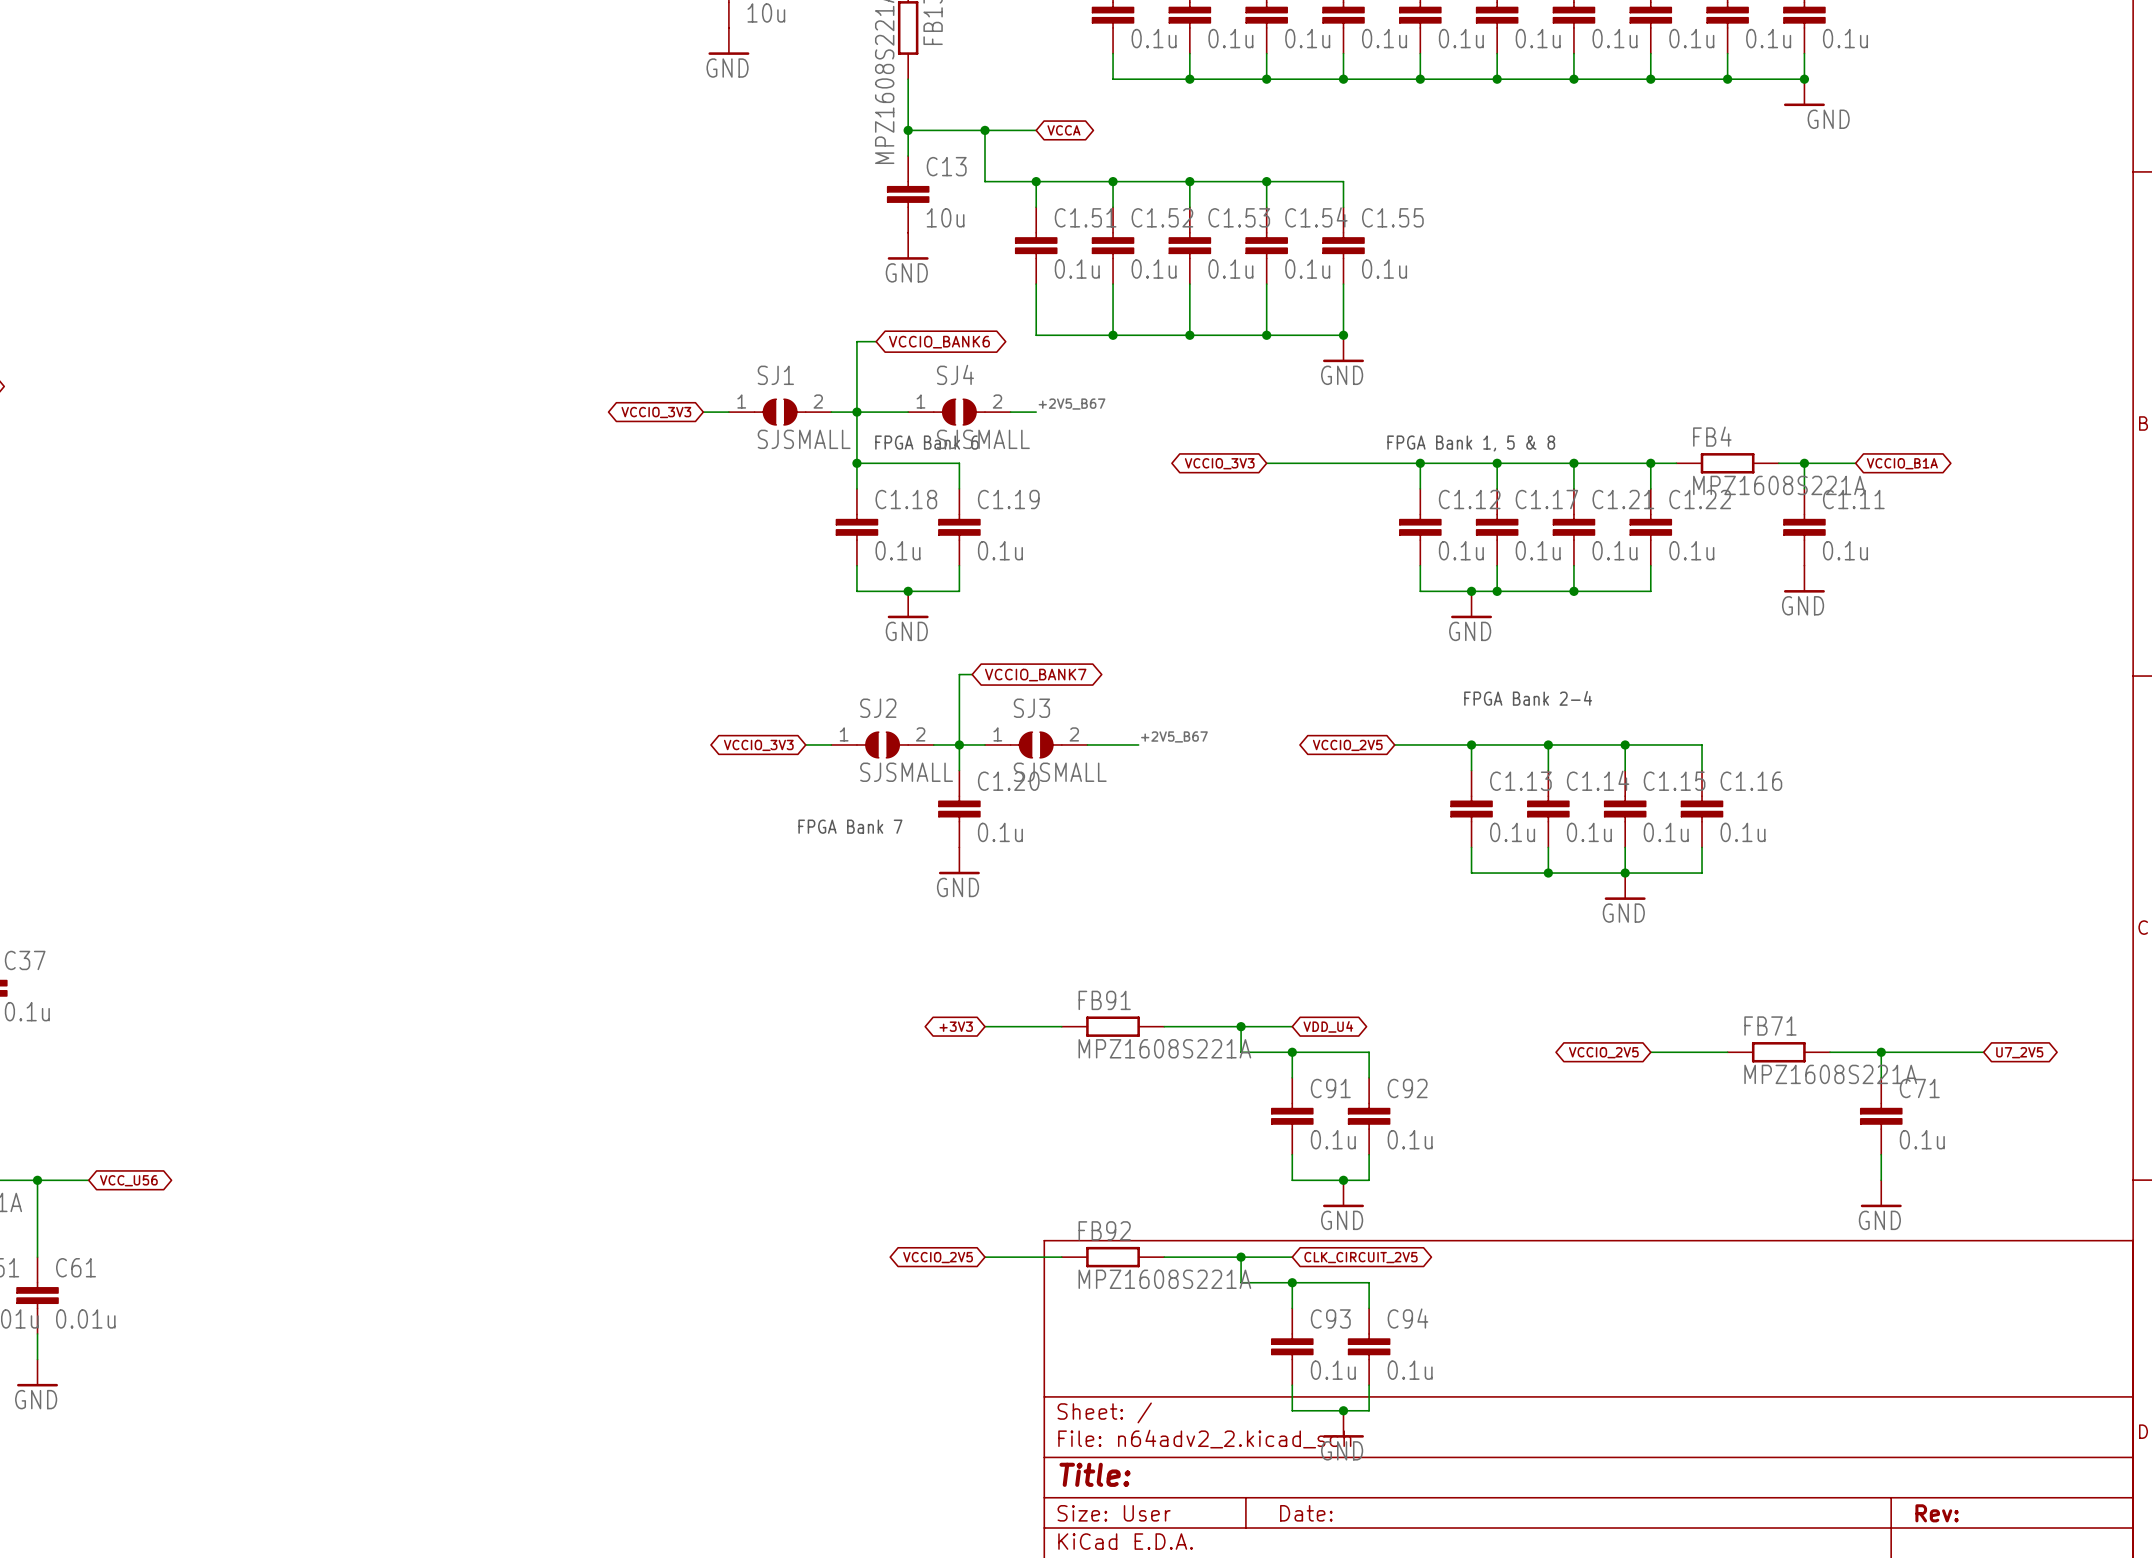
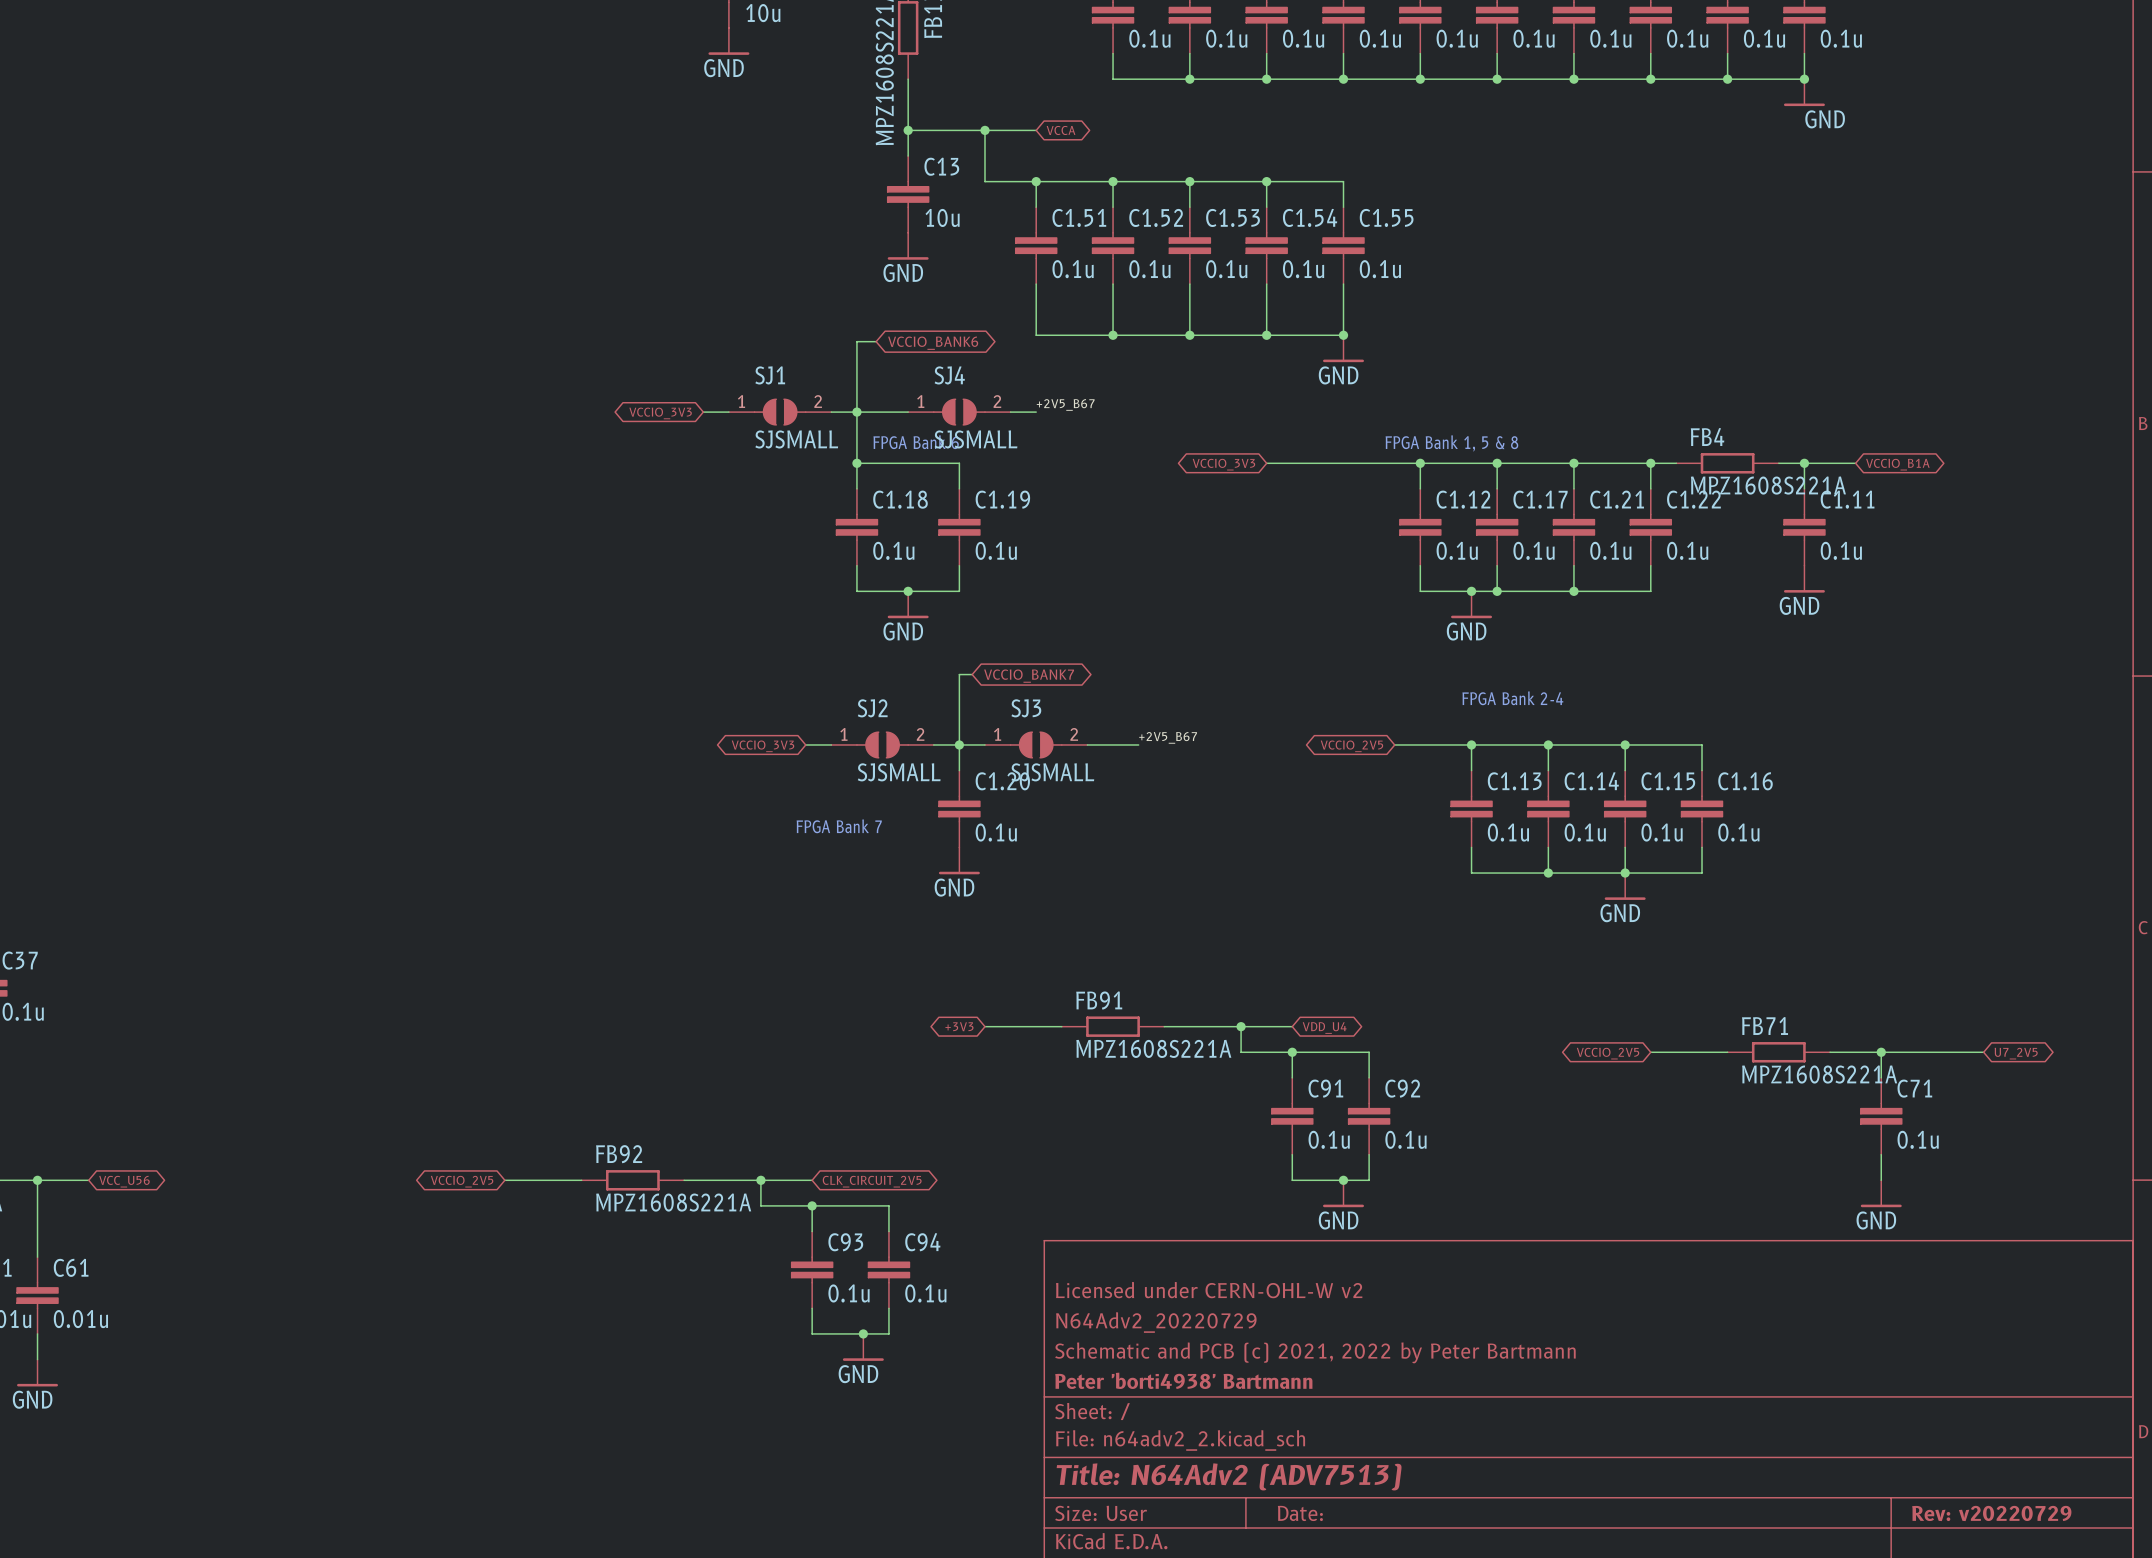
global label: none -> VCCIO_2V5 (462, 1181)
wire: none -> (504, 1180) (581, 1180)
wire: none -> (684, 1180) (812, 1180)
wire: none -> (760, 1180) (760, 1205) (888, 1205) (888, 1231)
junction: none -> (760, 1180)
global label: none -> CLK_CIRCUIT_2V5 (872, 1181)
wire: none -> (812, 1205) (812, 1231)
junction: none -> (812, 1205)
global label: VCCIO_2V5 (938, 1257) -> none
wire: (984, 1257) (1061, 1257) -> none
FB92 position: (1113, 1257) -> (632, 1180)
wire: (1164, 1257) (1292, 1257) -> none
wire: (1241, 1257) (1241, 1282) (1369, 1282) (1369, 1308) -> none
junction: (1241, 1257) -> none
global label: CLK_CIRCUIT_2V5 (1360, 1257) -> none
wire: (1292, 1282) (1292, 1308) -> none
junction: (1292, 1282) -> none
title block: none -> Licensed under CERN-OHL-W v2 (1209, 1290)
wire: none -> (812, 1308) (812, 1333) (888, 1333) (888, 1308)
title block: none -> N64Adv2_20220729 (1156, 1322)
junction: none -> (863, 1333)
C93 position: (1292, 1346) -> (812, 1269)
C94 position: (1369, 1346) -> (888, 1269)
power symbol: none -> GND (863, 1347)
title block: none -> Schematic and PCB (c) 2021, 2022 by Peter Bartmann (1315, 1352)
title block: none -> Peter 'borti4938' Bartmann (1183, 1380)
wire: (1292, 1385) (1292, 1410) (1369, 1410) (1369, 1385) -> none
junction: (1343, 1410) -> none
power symbol: GND (1343, 1424) -> none
title block: Title: (1095, 1474) -> Title: N64Adv2 (ADV7513) (1229, 1476)
title block: Rev: (1937, 1513) -> Rev: v20220729 (1991, 1513)

